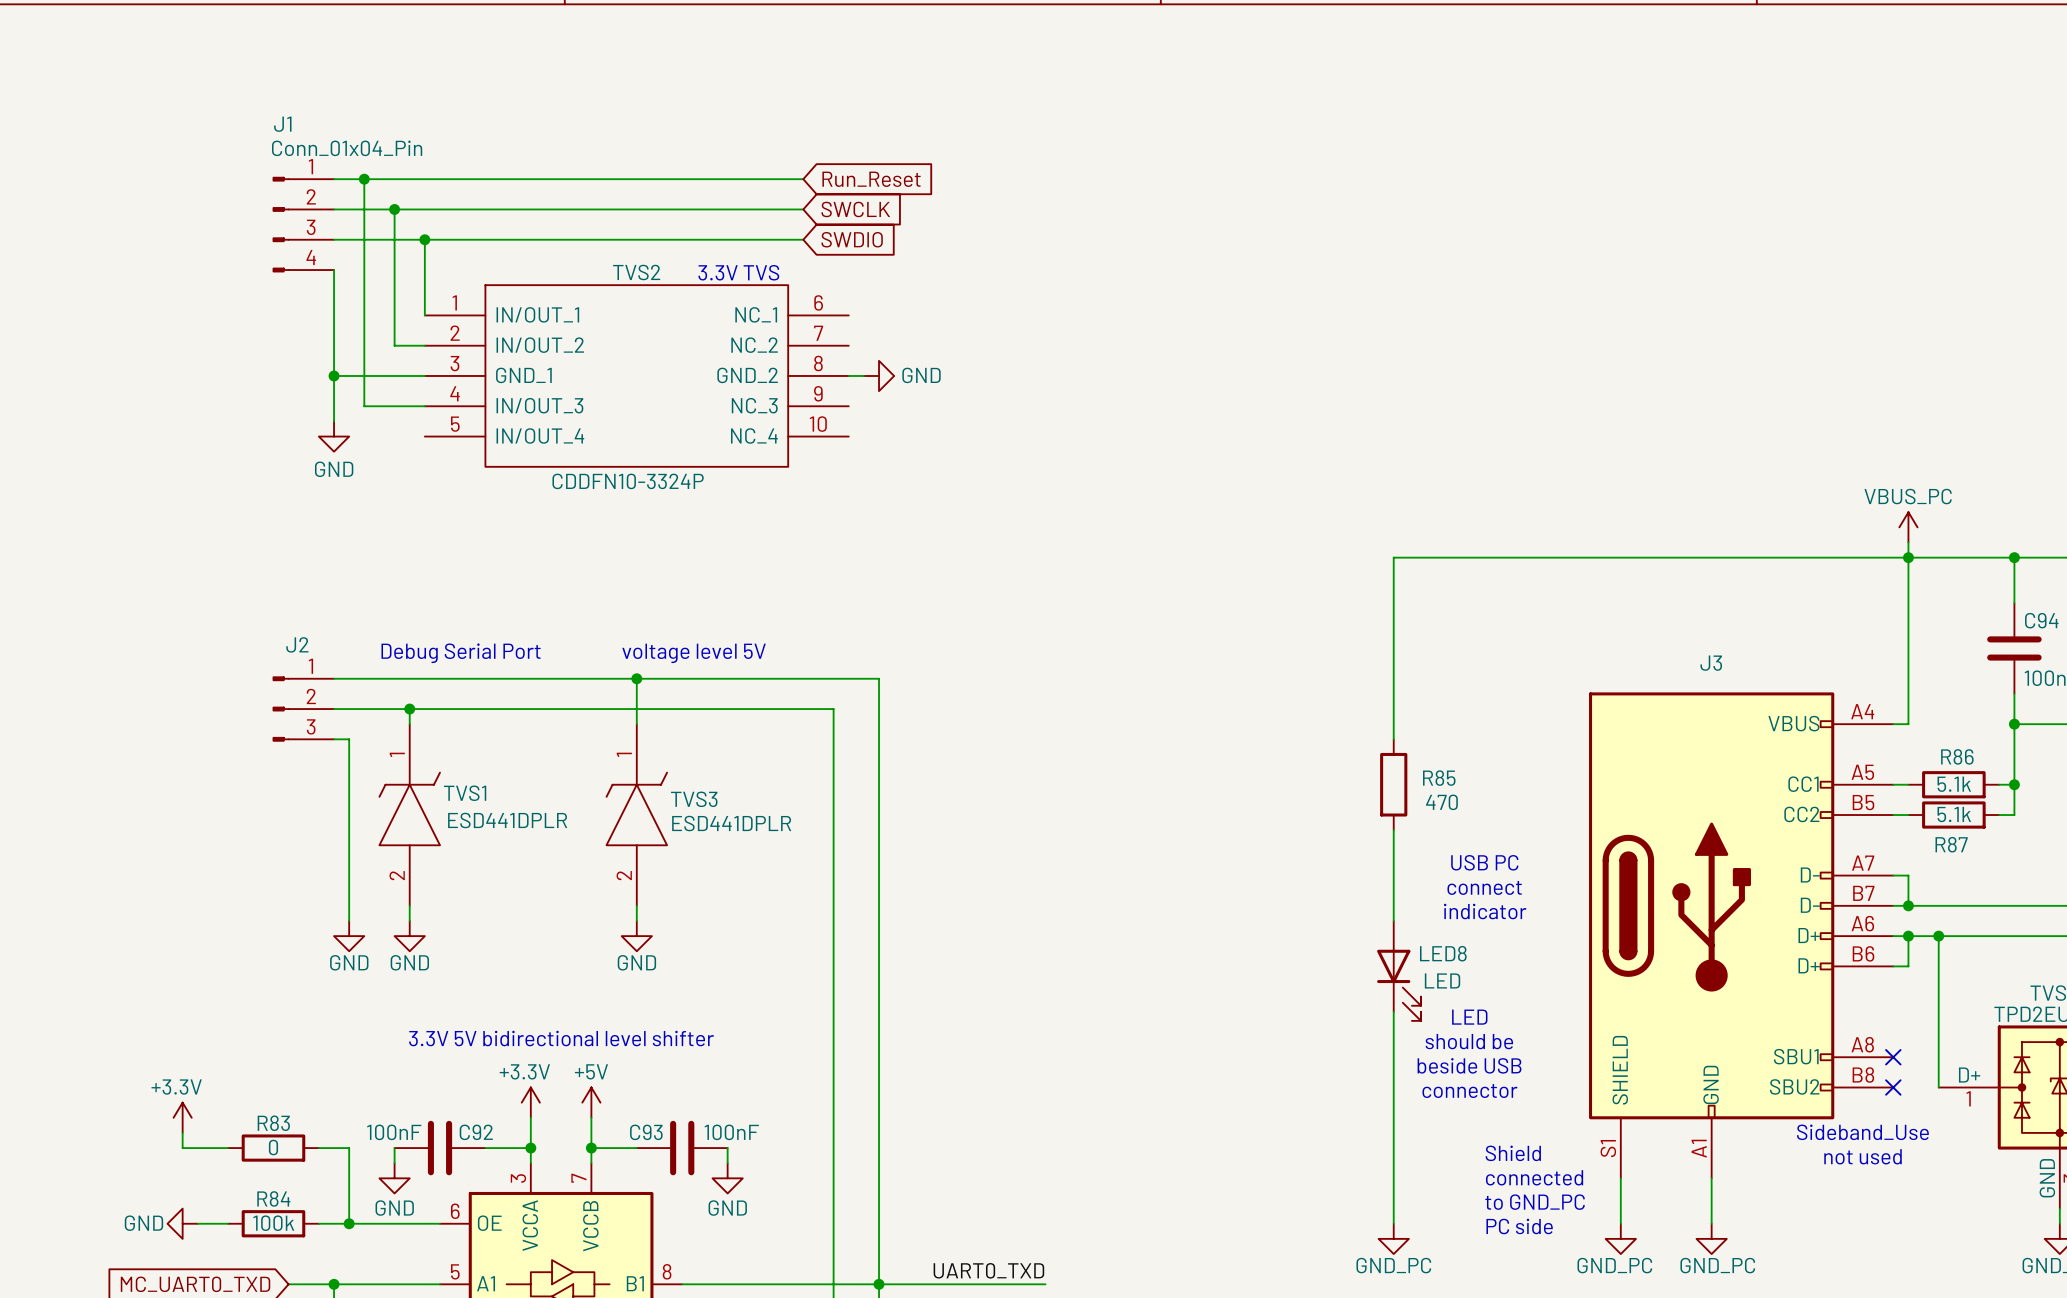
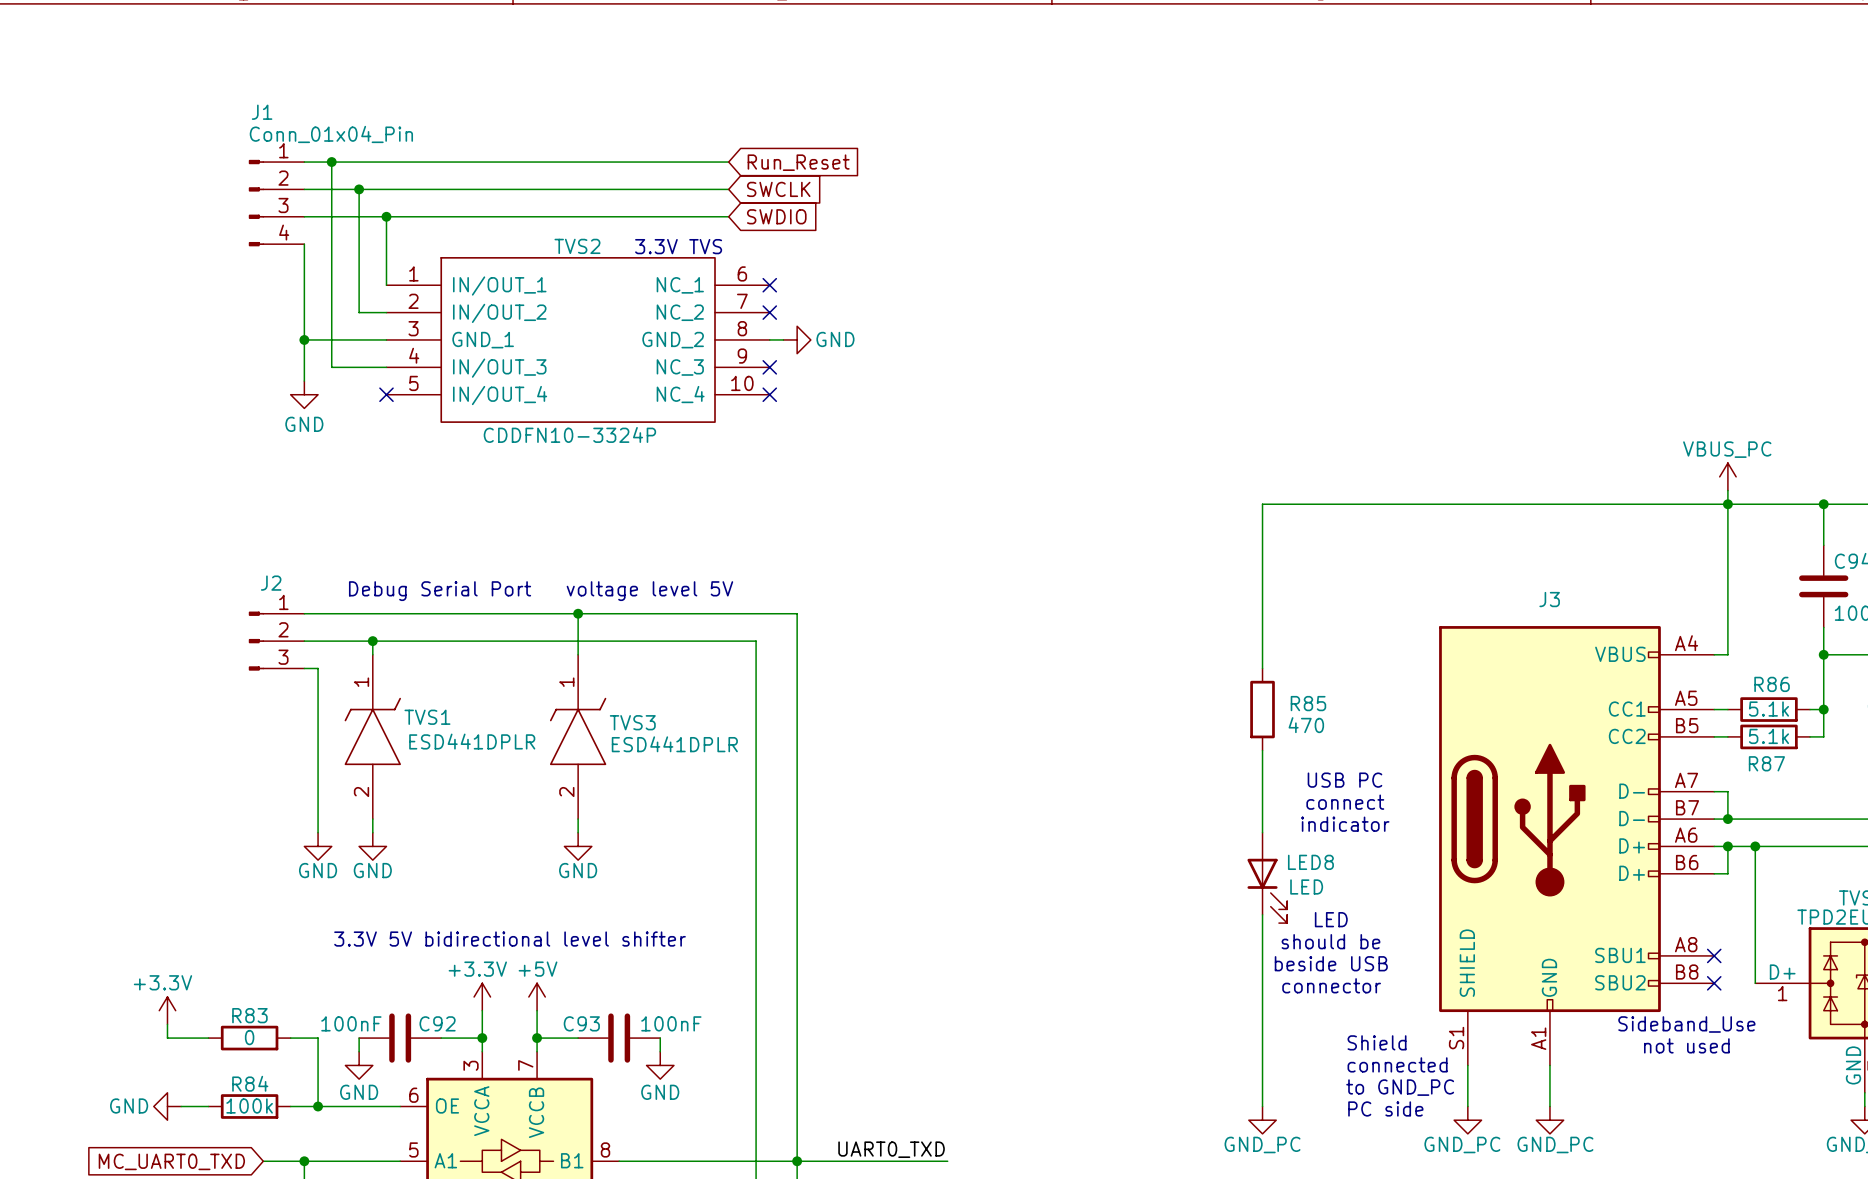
no-connect mark: none -> (769, 285)
no-connect mark: none -> (769, 312)
no-connect mark: none -> (769, 367)
no-connect mark: none -> (386, 394)
no-connect mark: none -> (769, 394)

